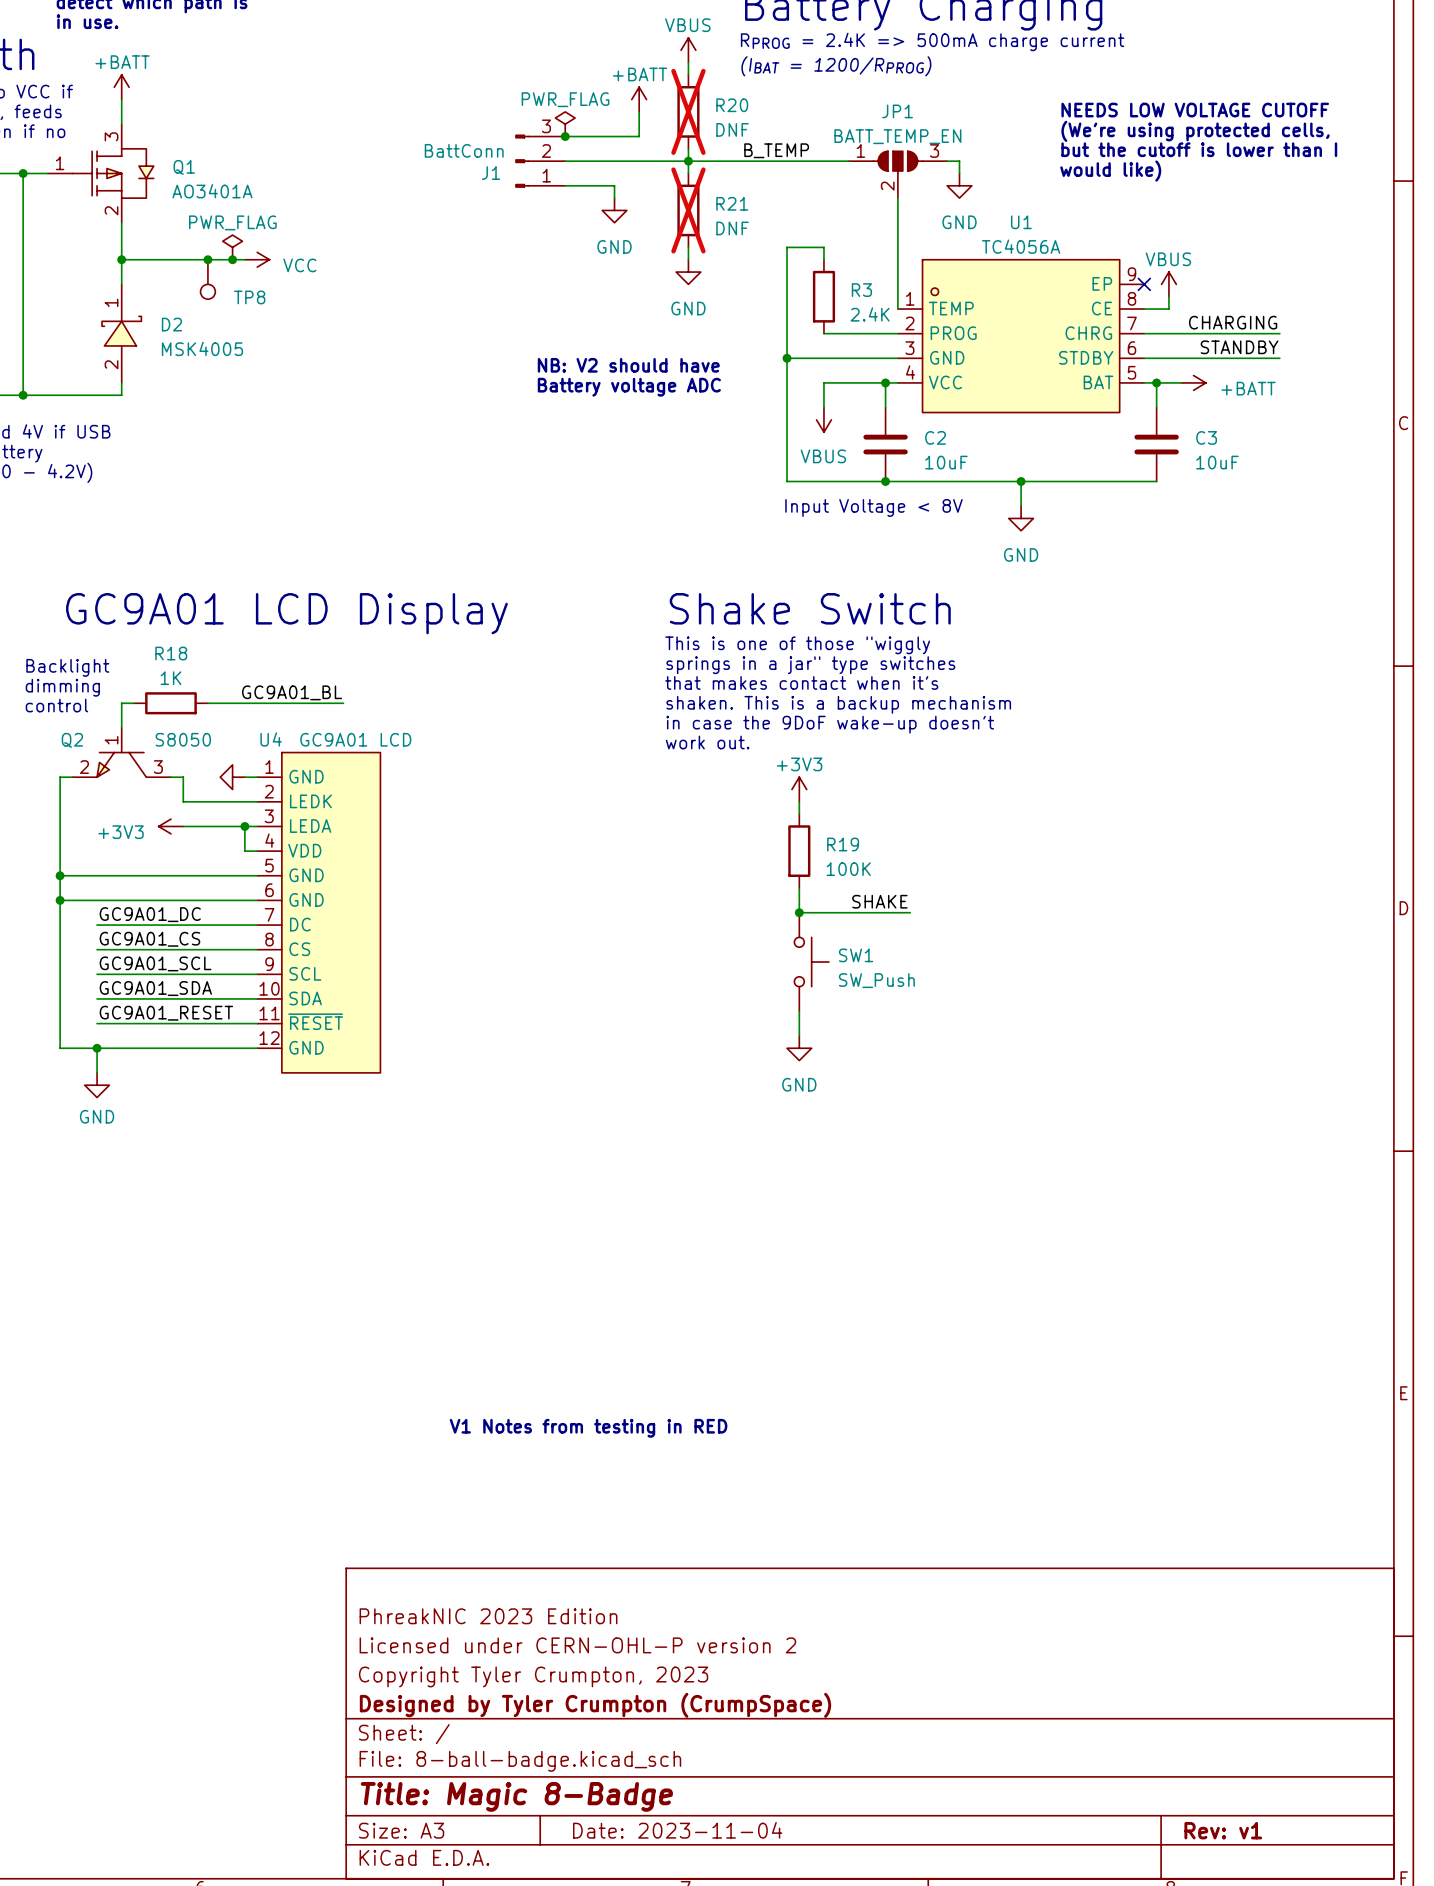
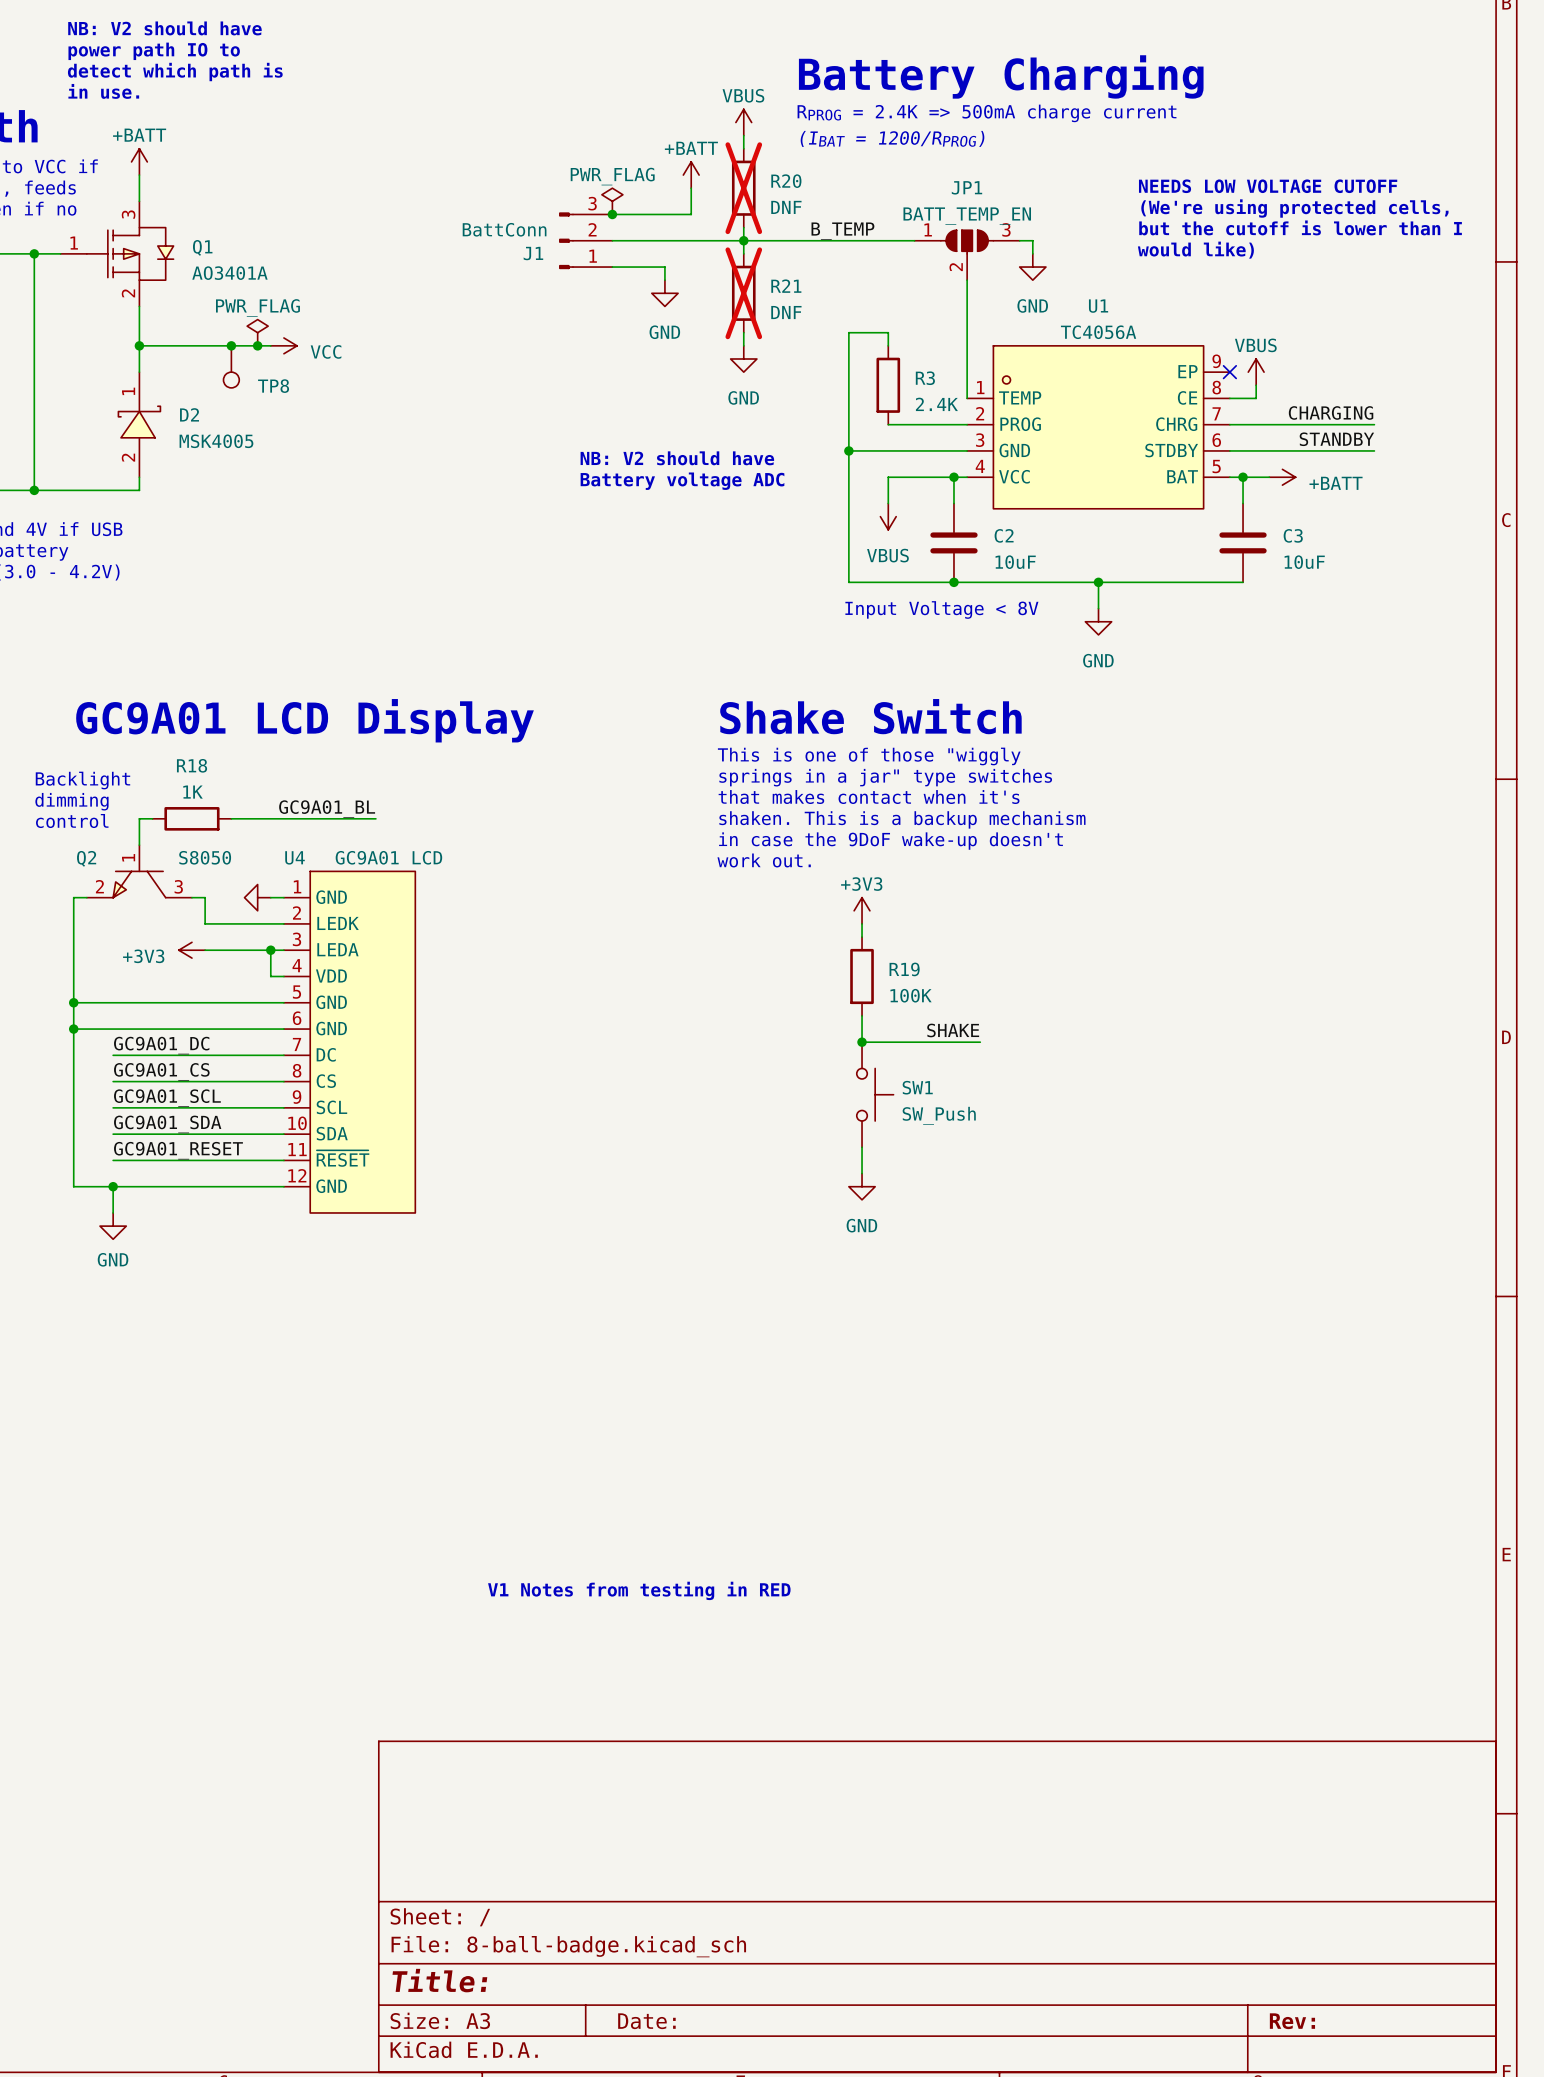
title block: PhreakNIC 2023 Edition (488, 1616) -> none
title block: Licensed under CERN-OHL-P version 2 (577, 1645) -> none
title block: Copyright Tyler Crumpton, 2023 (533, 1676) -> none
title block: Designed by Tyler Crumpton (CrumpSpace) (595, 1705) -> none
title block: Title: Magic 8-Badge (516, 1796) -> Title: (439, 1980)
title block: Date: 2023-11-04 (677, 1830) -> Date: (646, 2021)
title block: Rev: v1 (1223, 1830) -> Rev: (1292, 2021)

